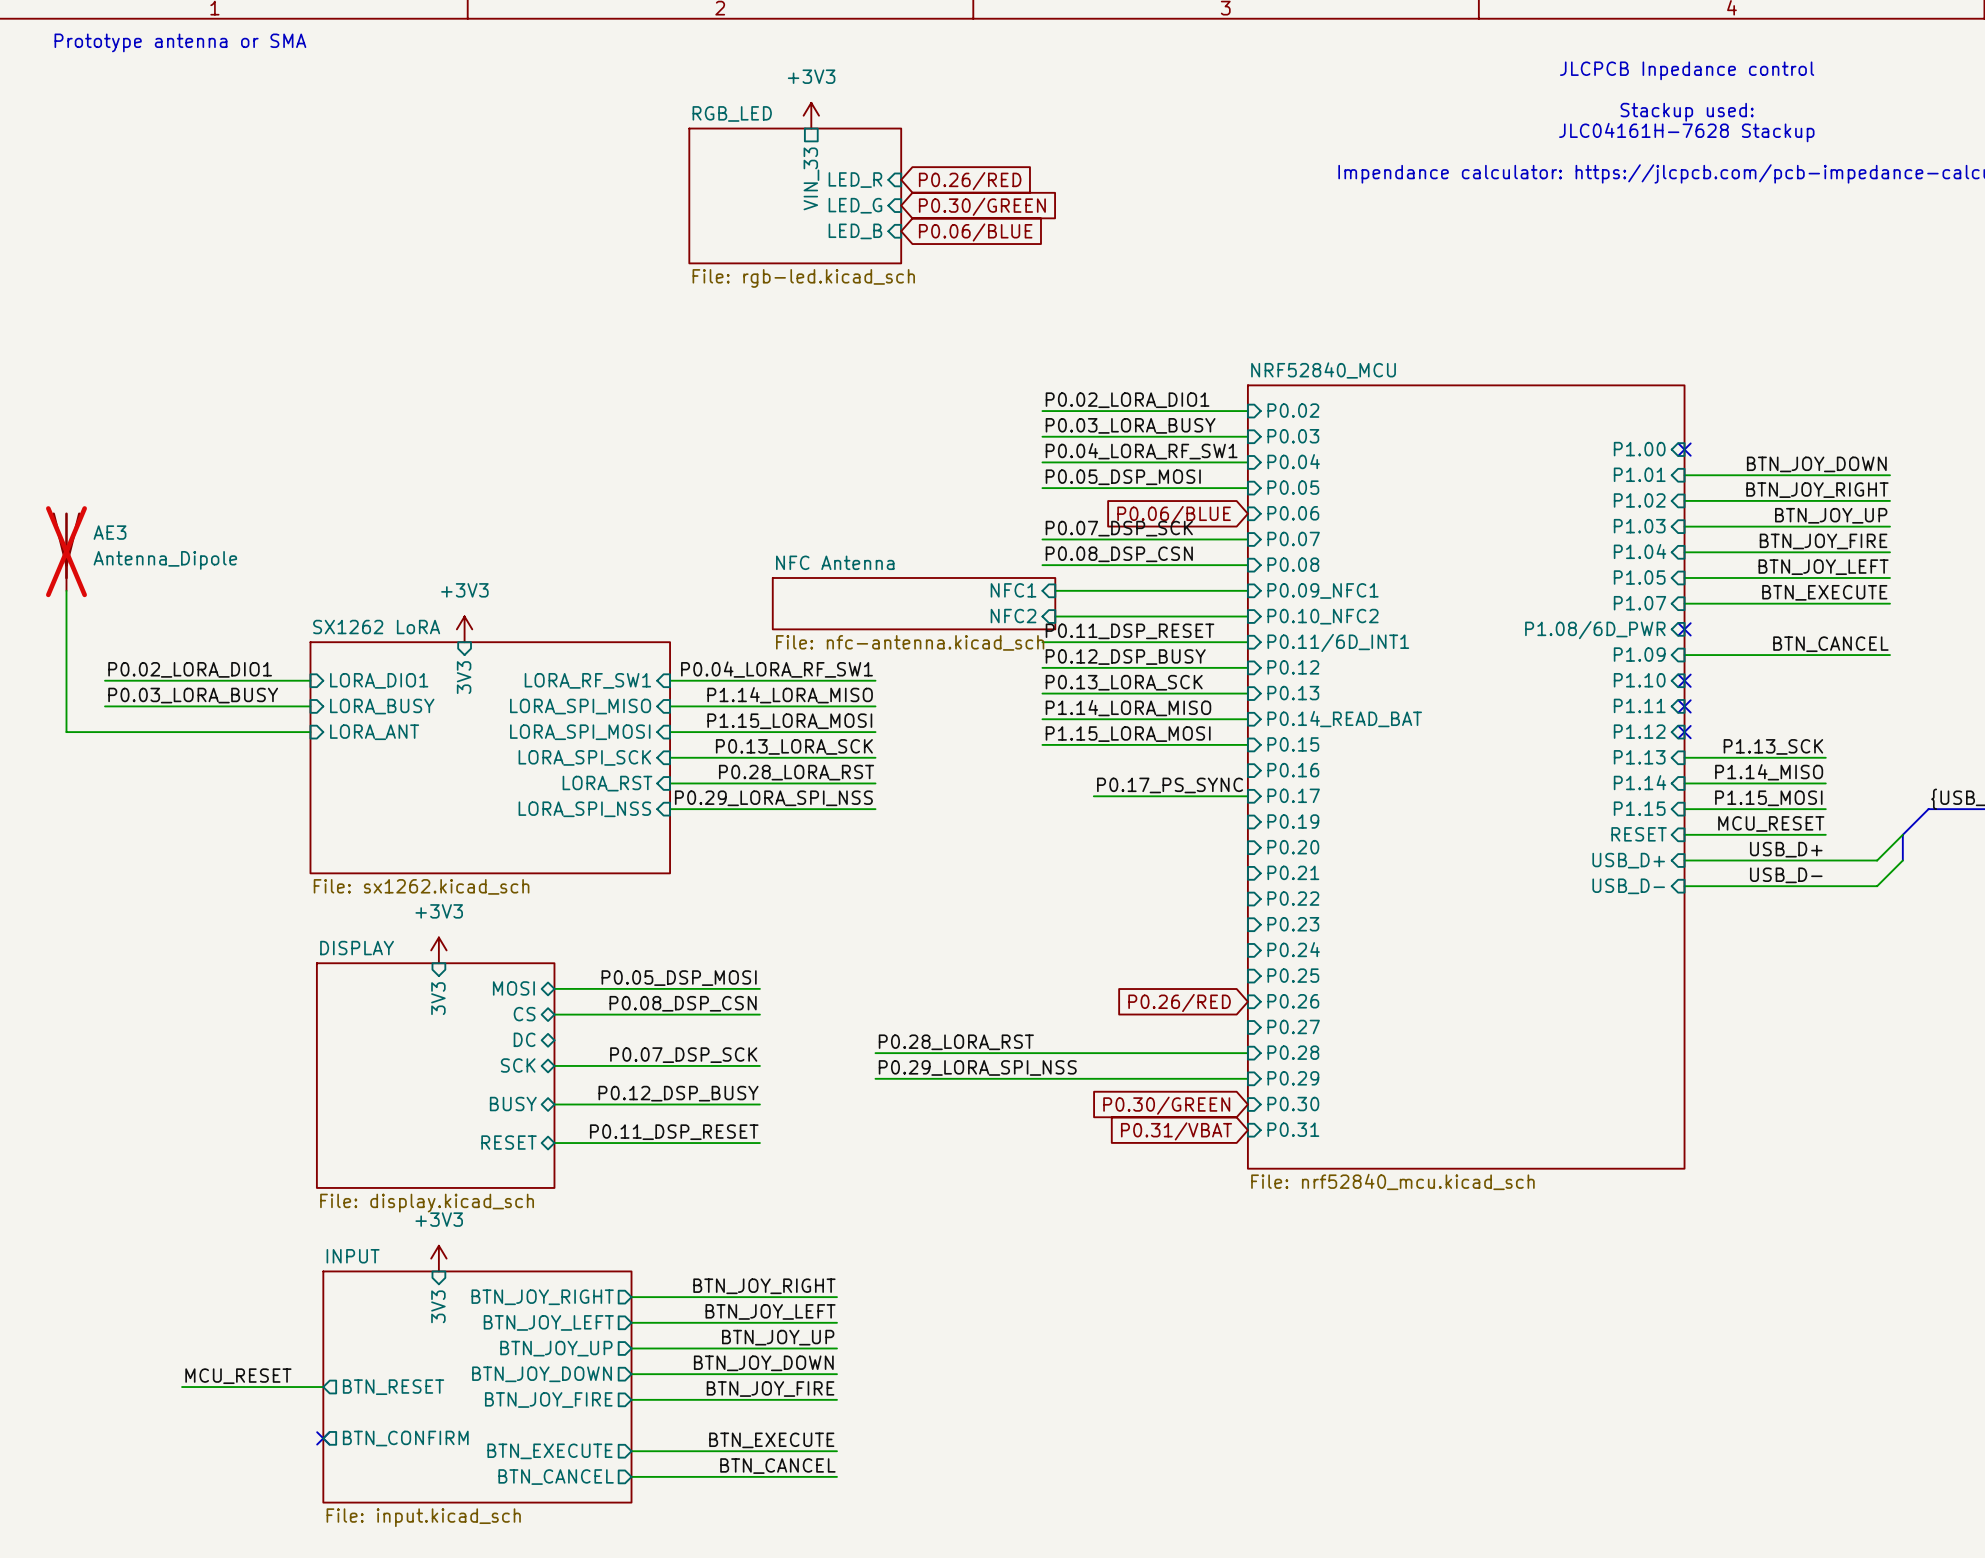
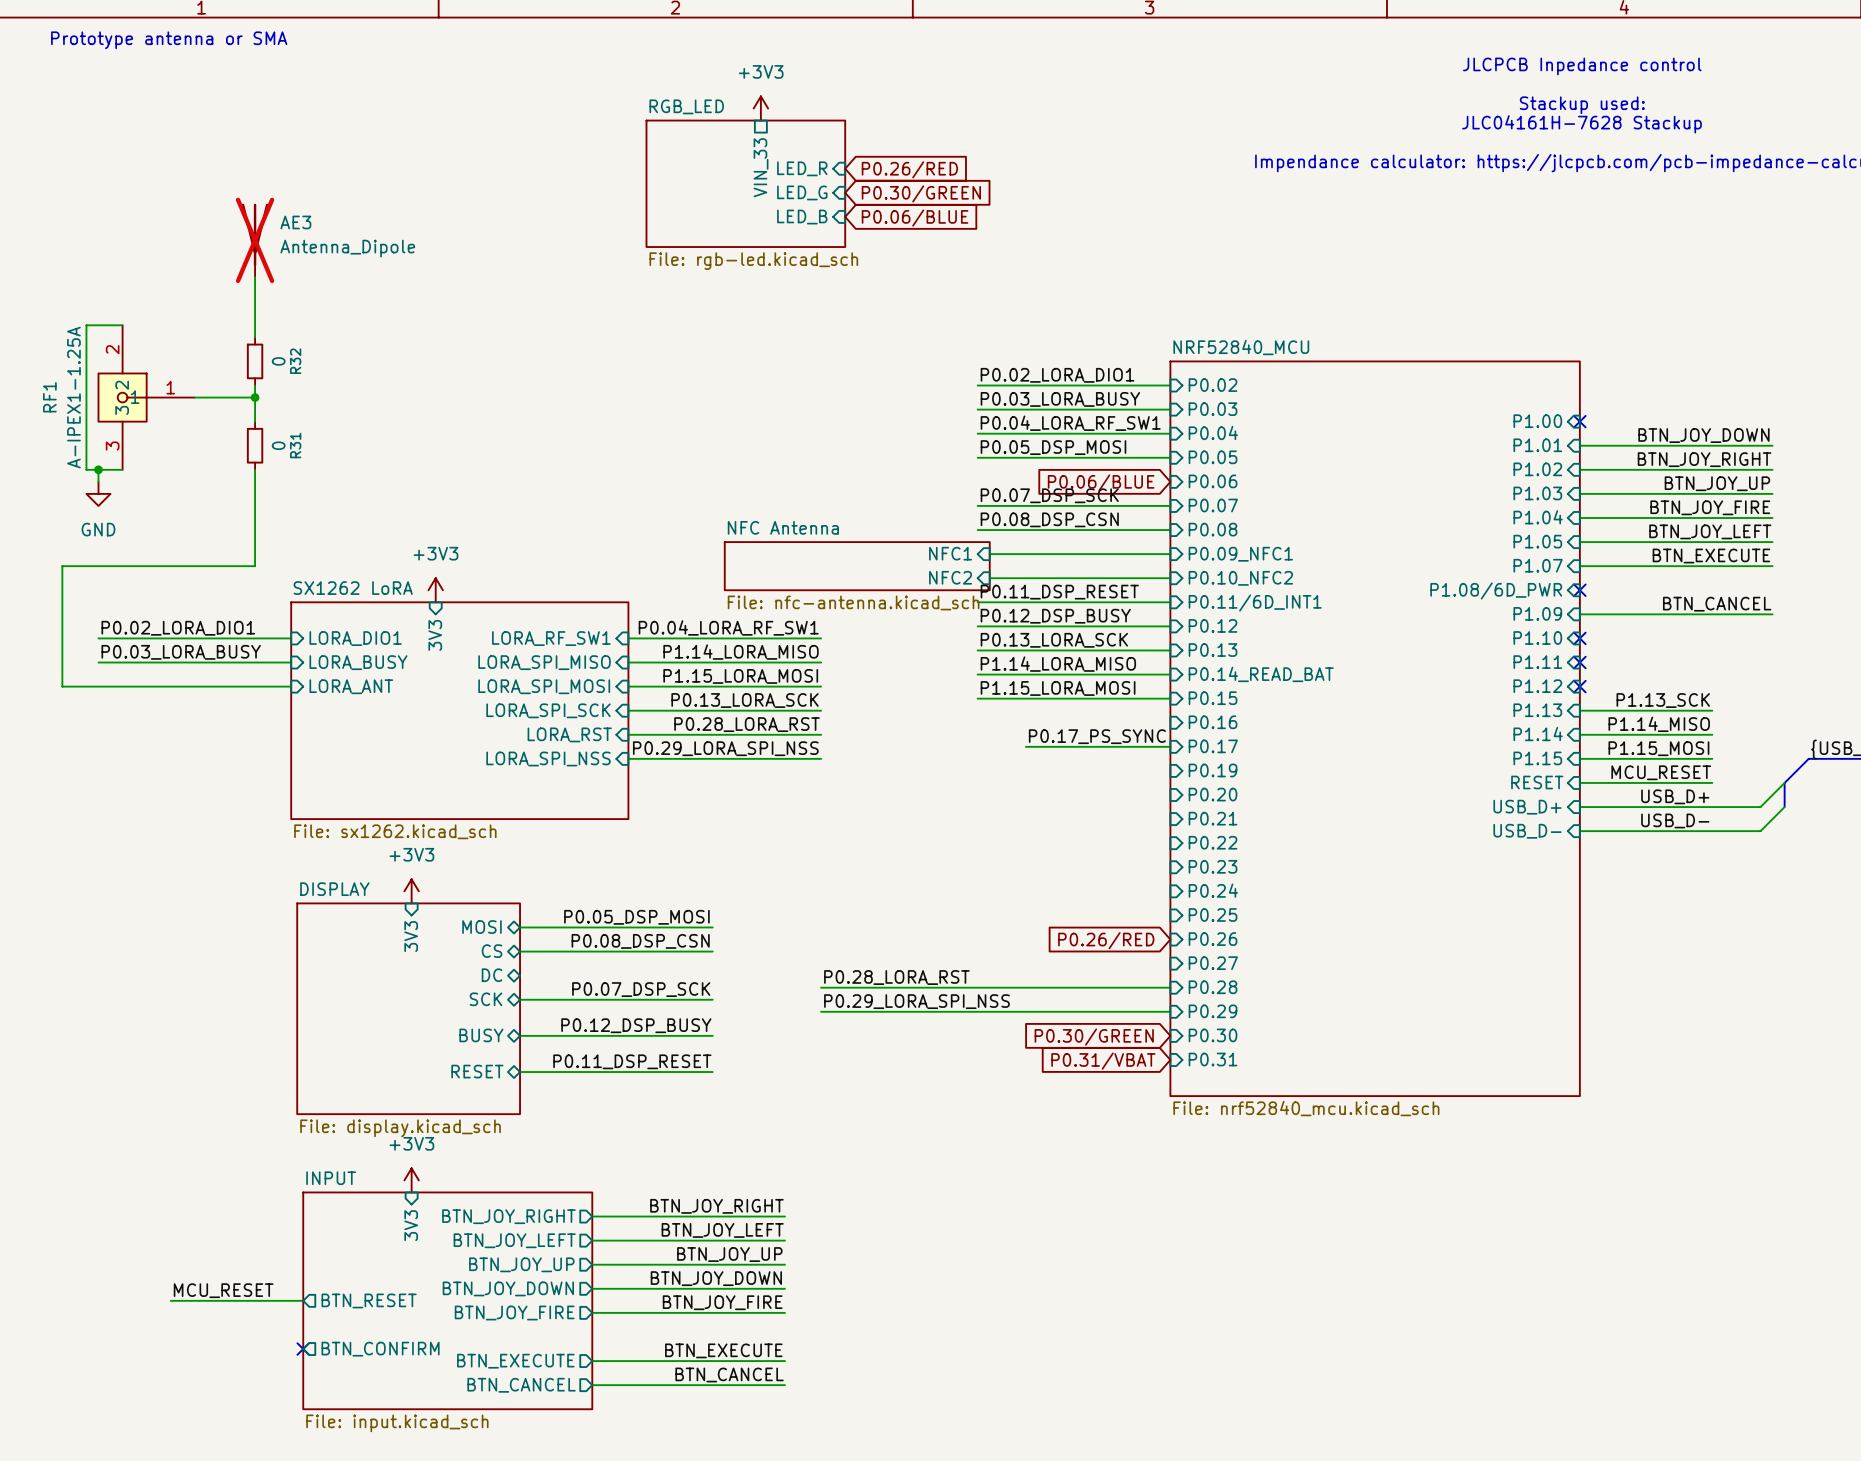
wire: none -> (255, 277) (255, 337)
wire: none -> (122, 325) (86, 325) (86, 469) (122, 469)
R32: none -> 0 (255, 361)
wire: none -> (255, 385) (255, 421)
RF1: none -> A-IPEX1-1.25A (146, 397)
wire: none -> (194, 397) (255, 397)
junction: none -> (255, 397)
R31: none -> 0 (255, 445)
wire: none -> (98, 469) (98, 481)
junction: none -> (98, 469)
power symbol: none -> GND (98, 493)
AE3 position: (66, 551) -> (255, 240)
wire: (66, 590) (66, 603) -> (255, 469) (255, 566) (62, 566)

